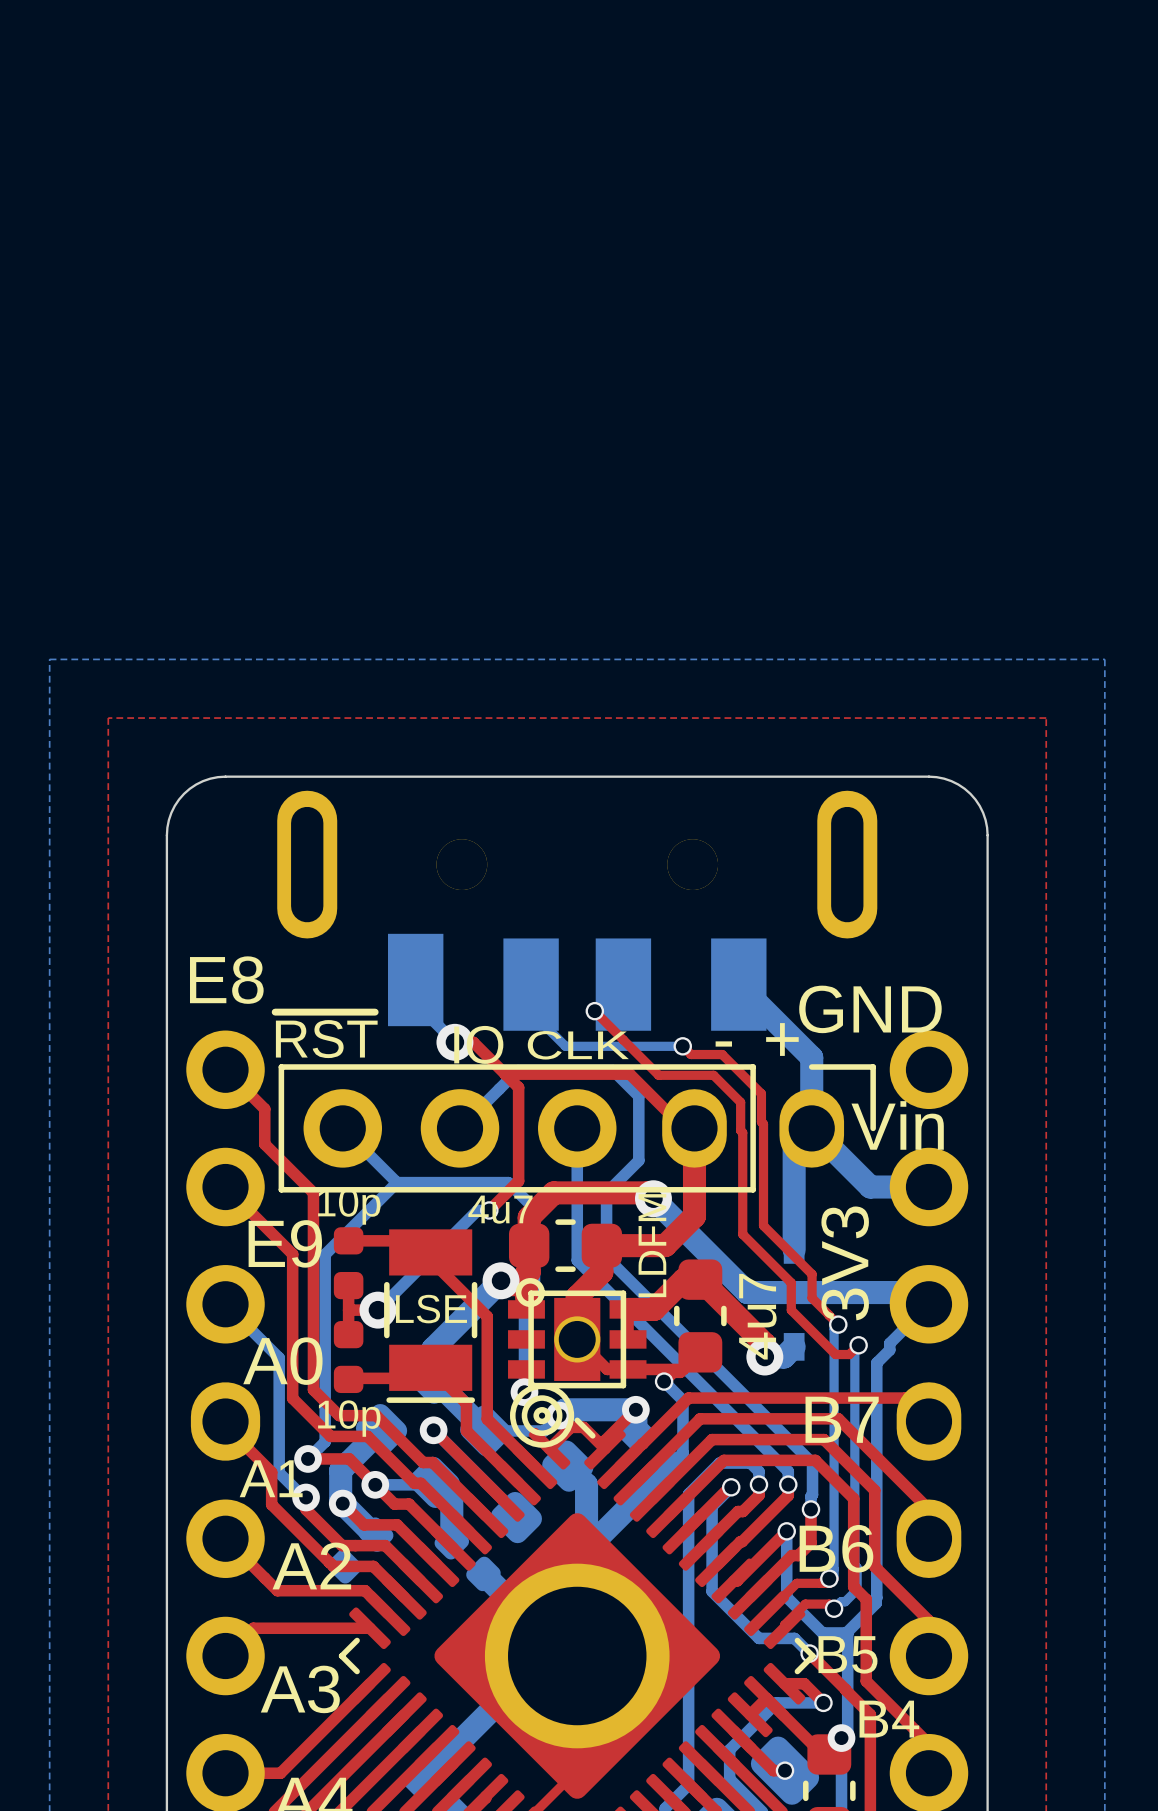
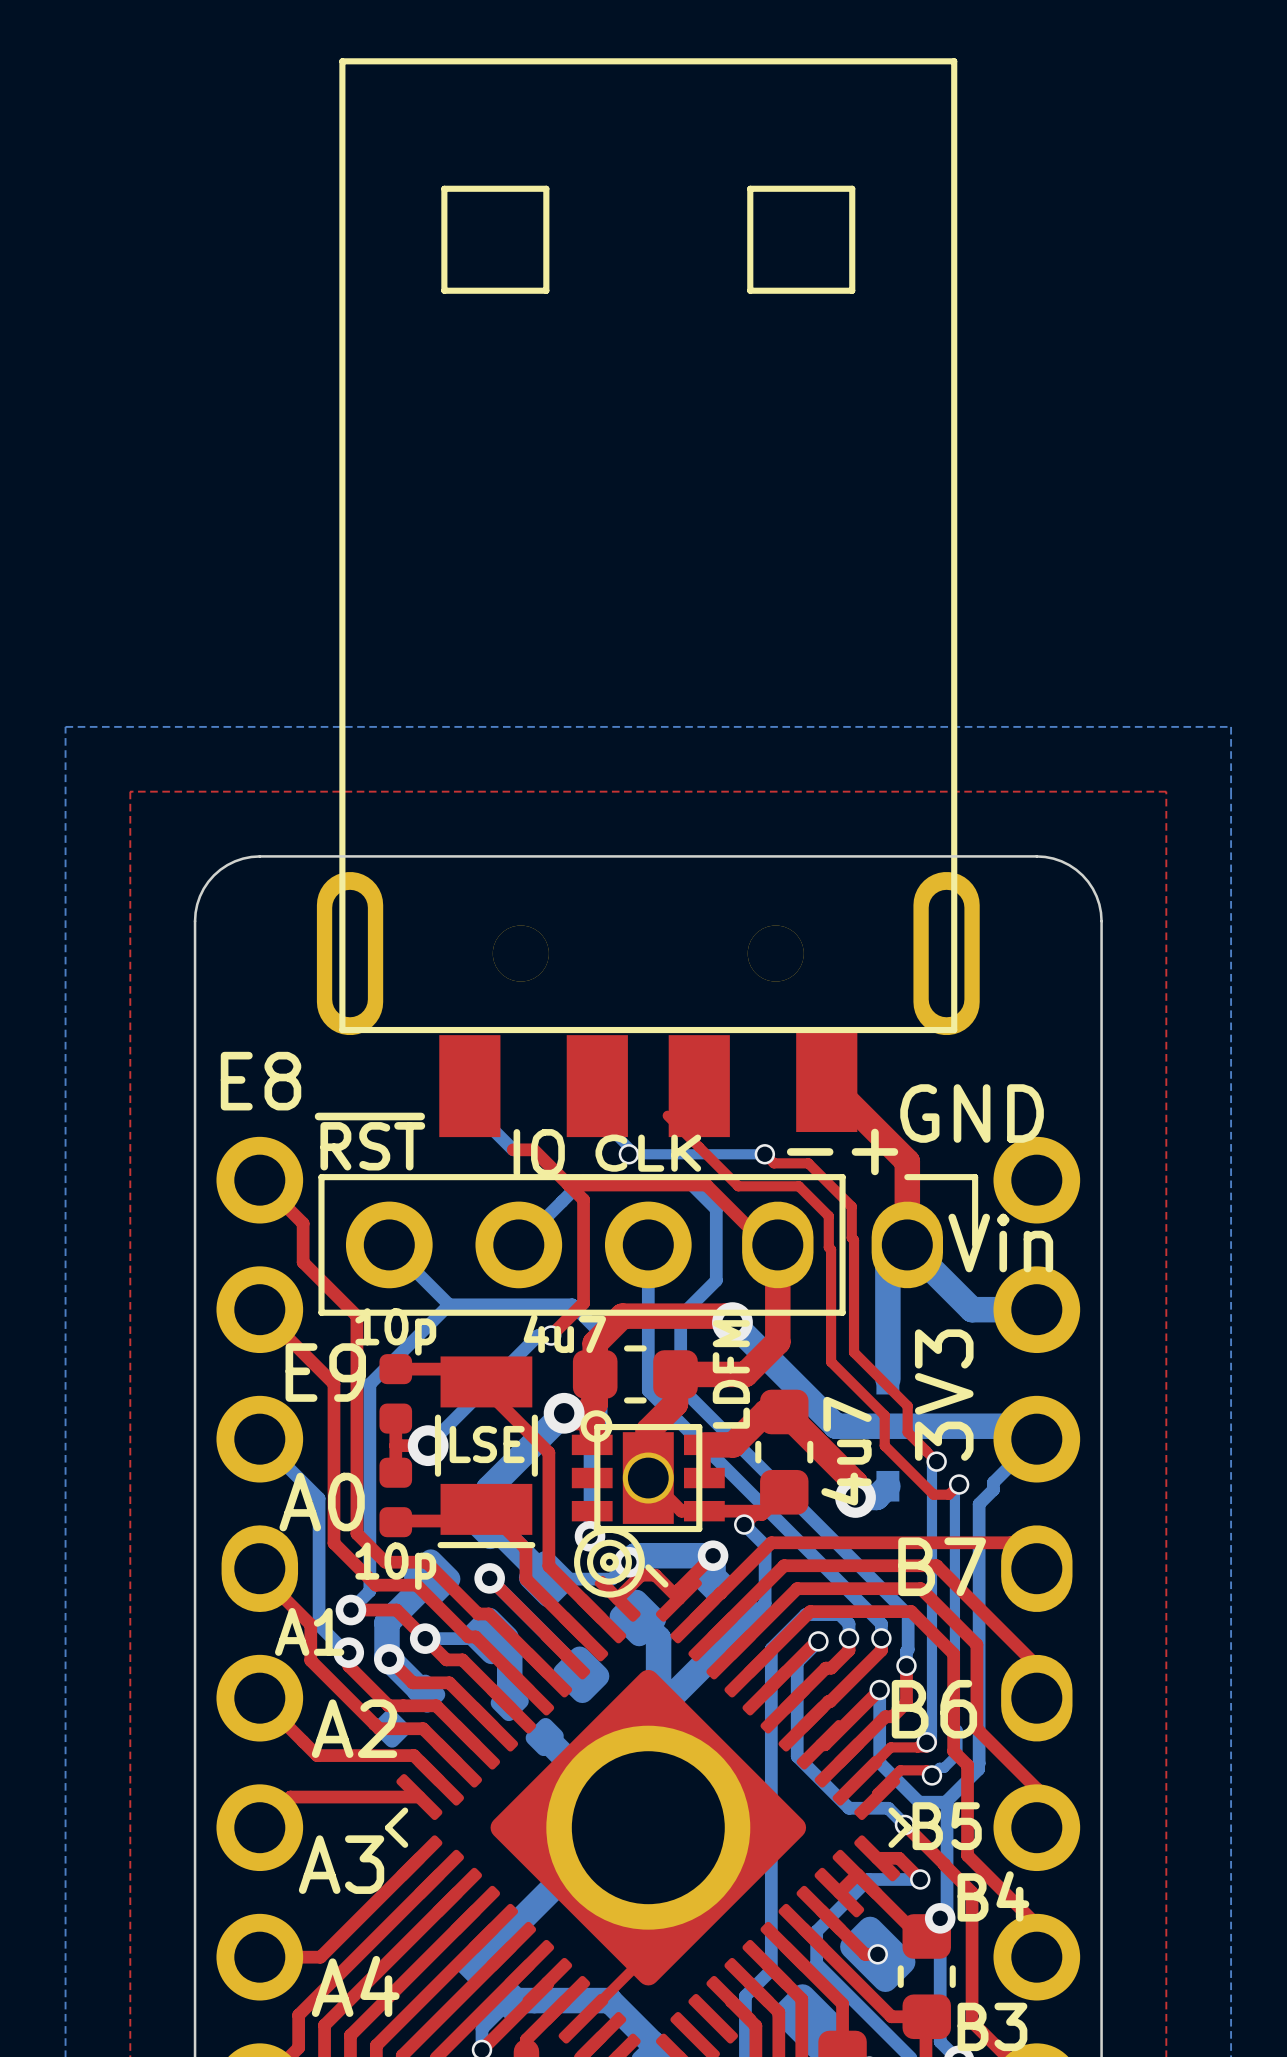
part side: bottom (577, 910) -> top (648, 597)
top track: none -> (826, 1081) (907, 1161) (907, 1244)
bottom track: (738, 984) (811, 1057) (811, 1128) -> none
via position: (594, 1011) -> (628, 1154)
via: (454, 1042) -> none

